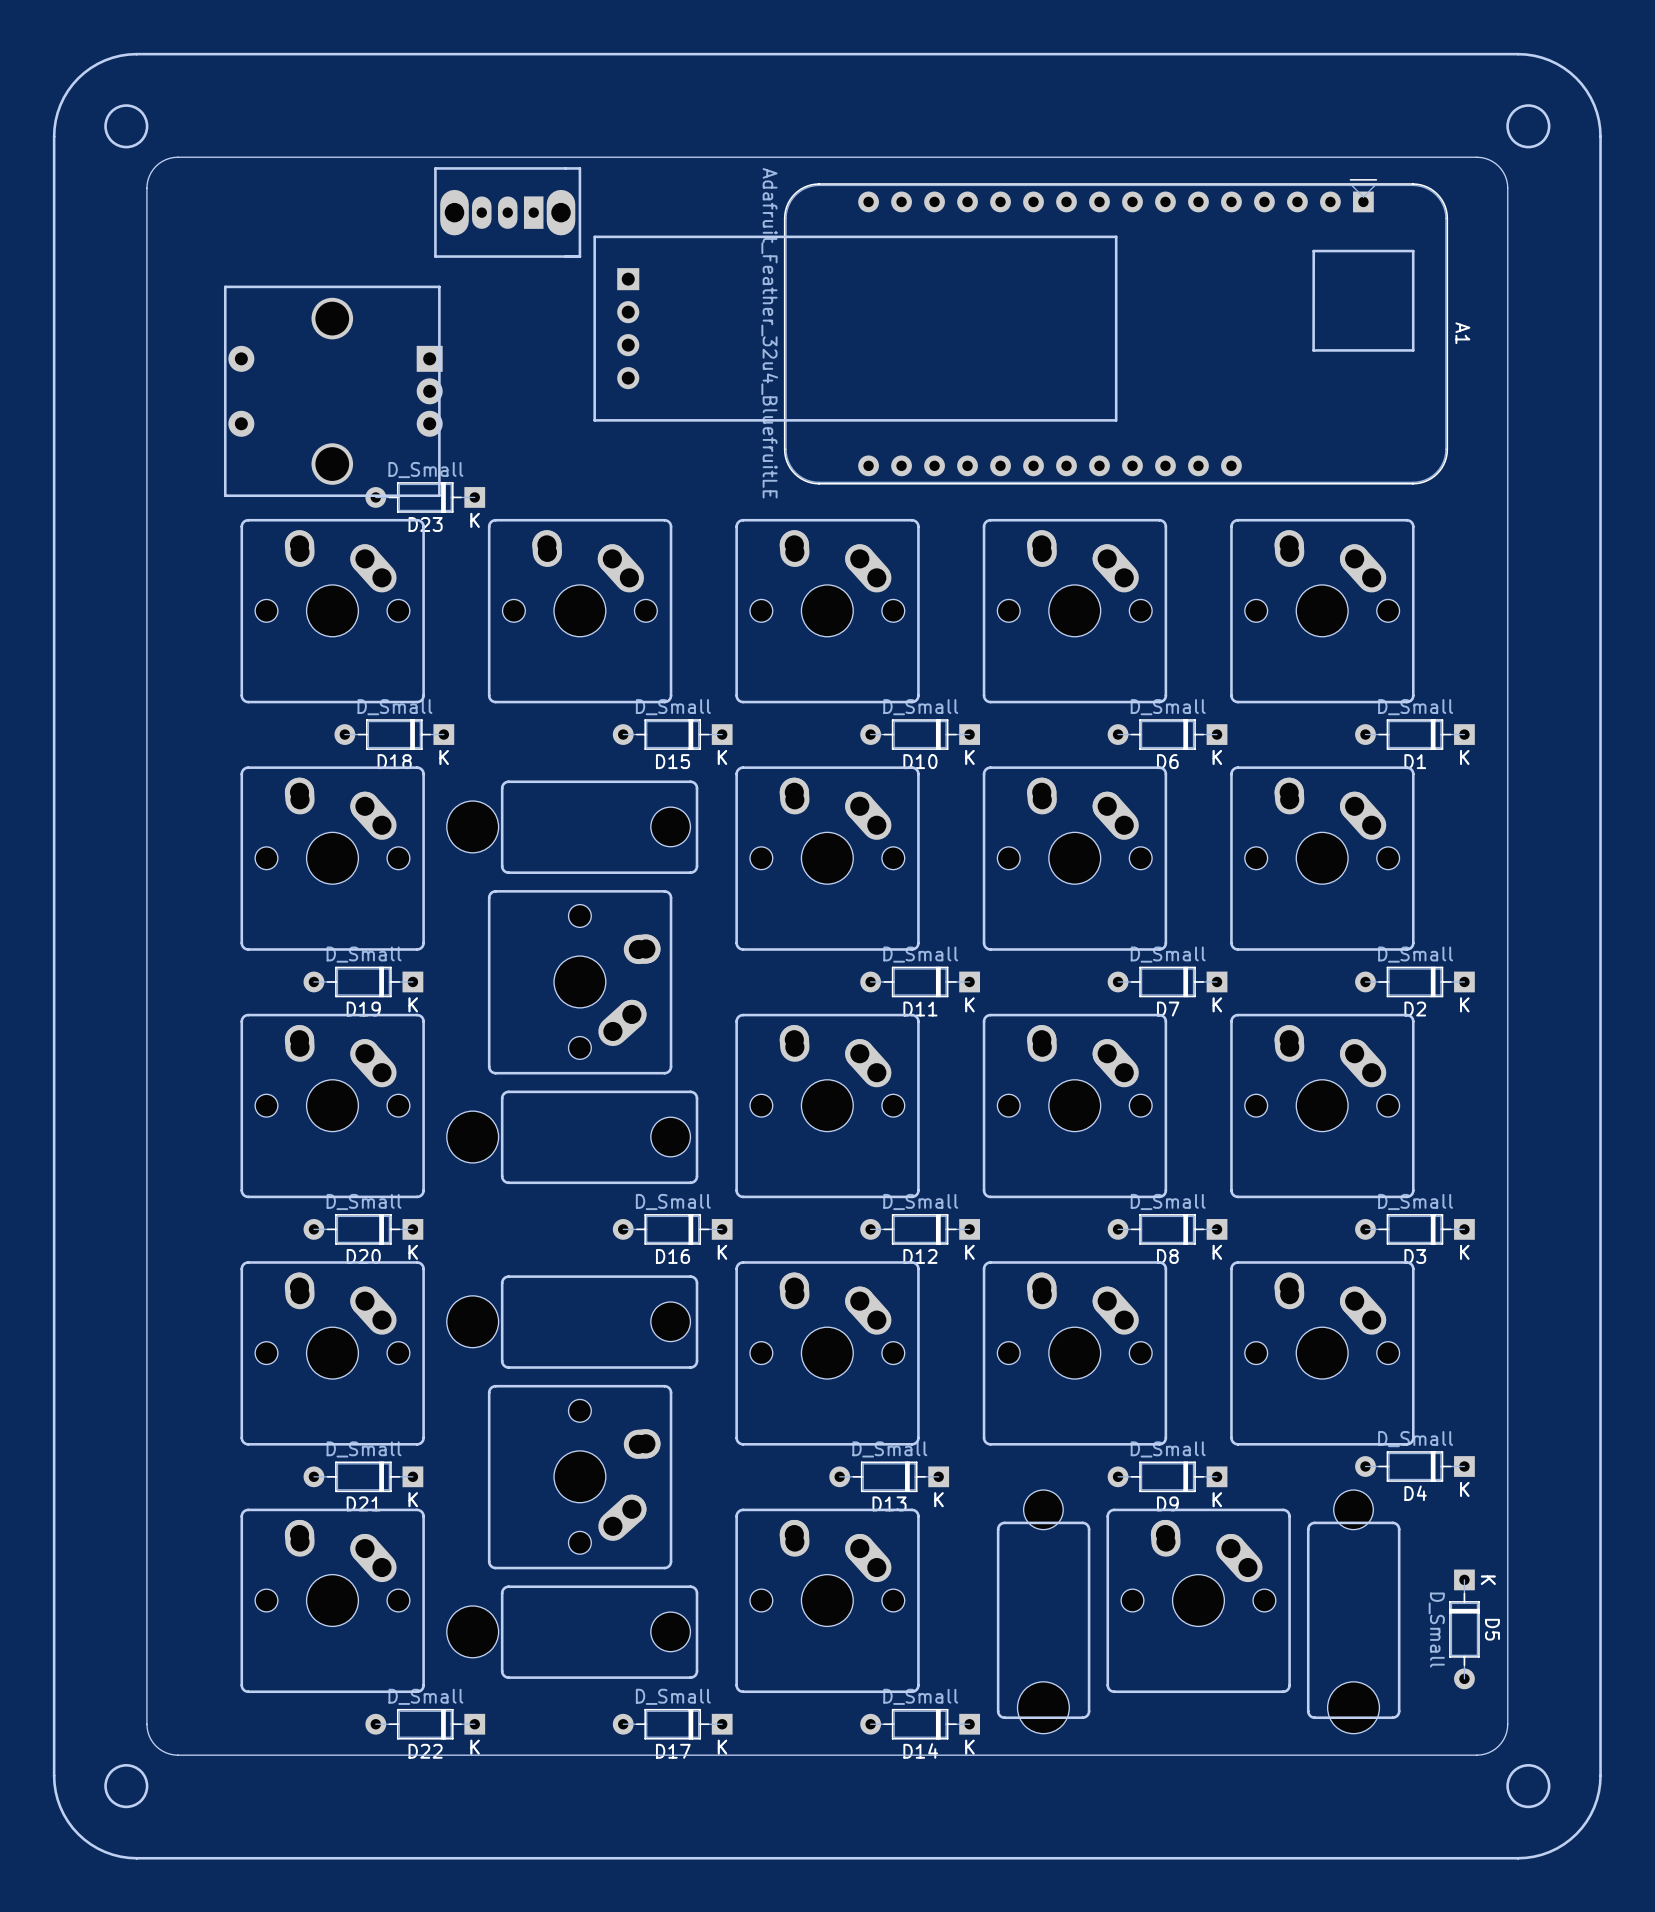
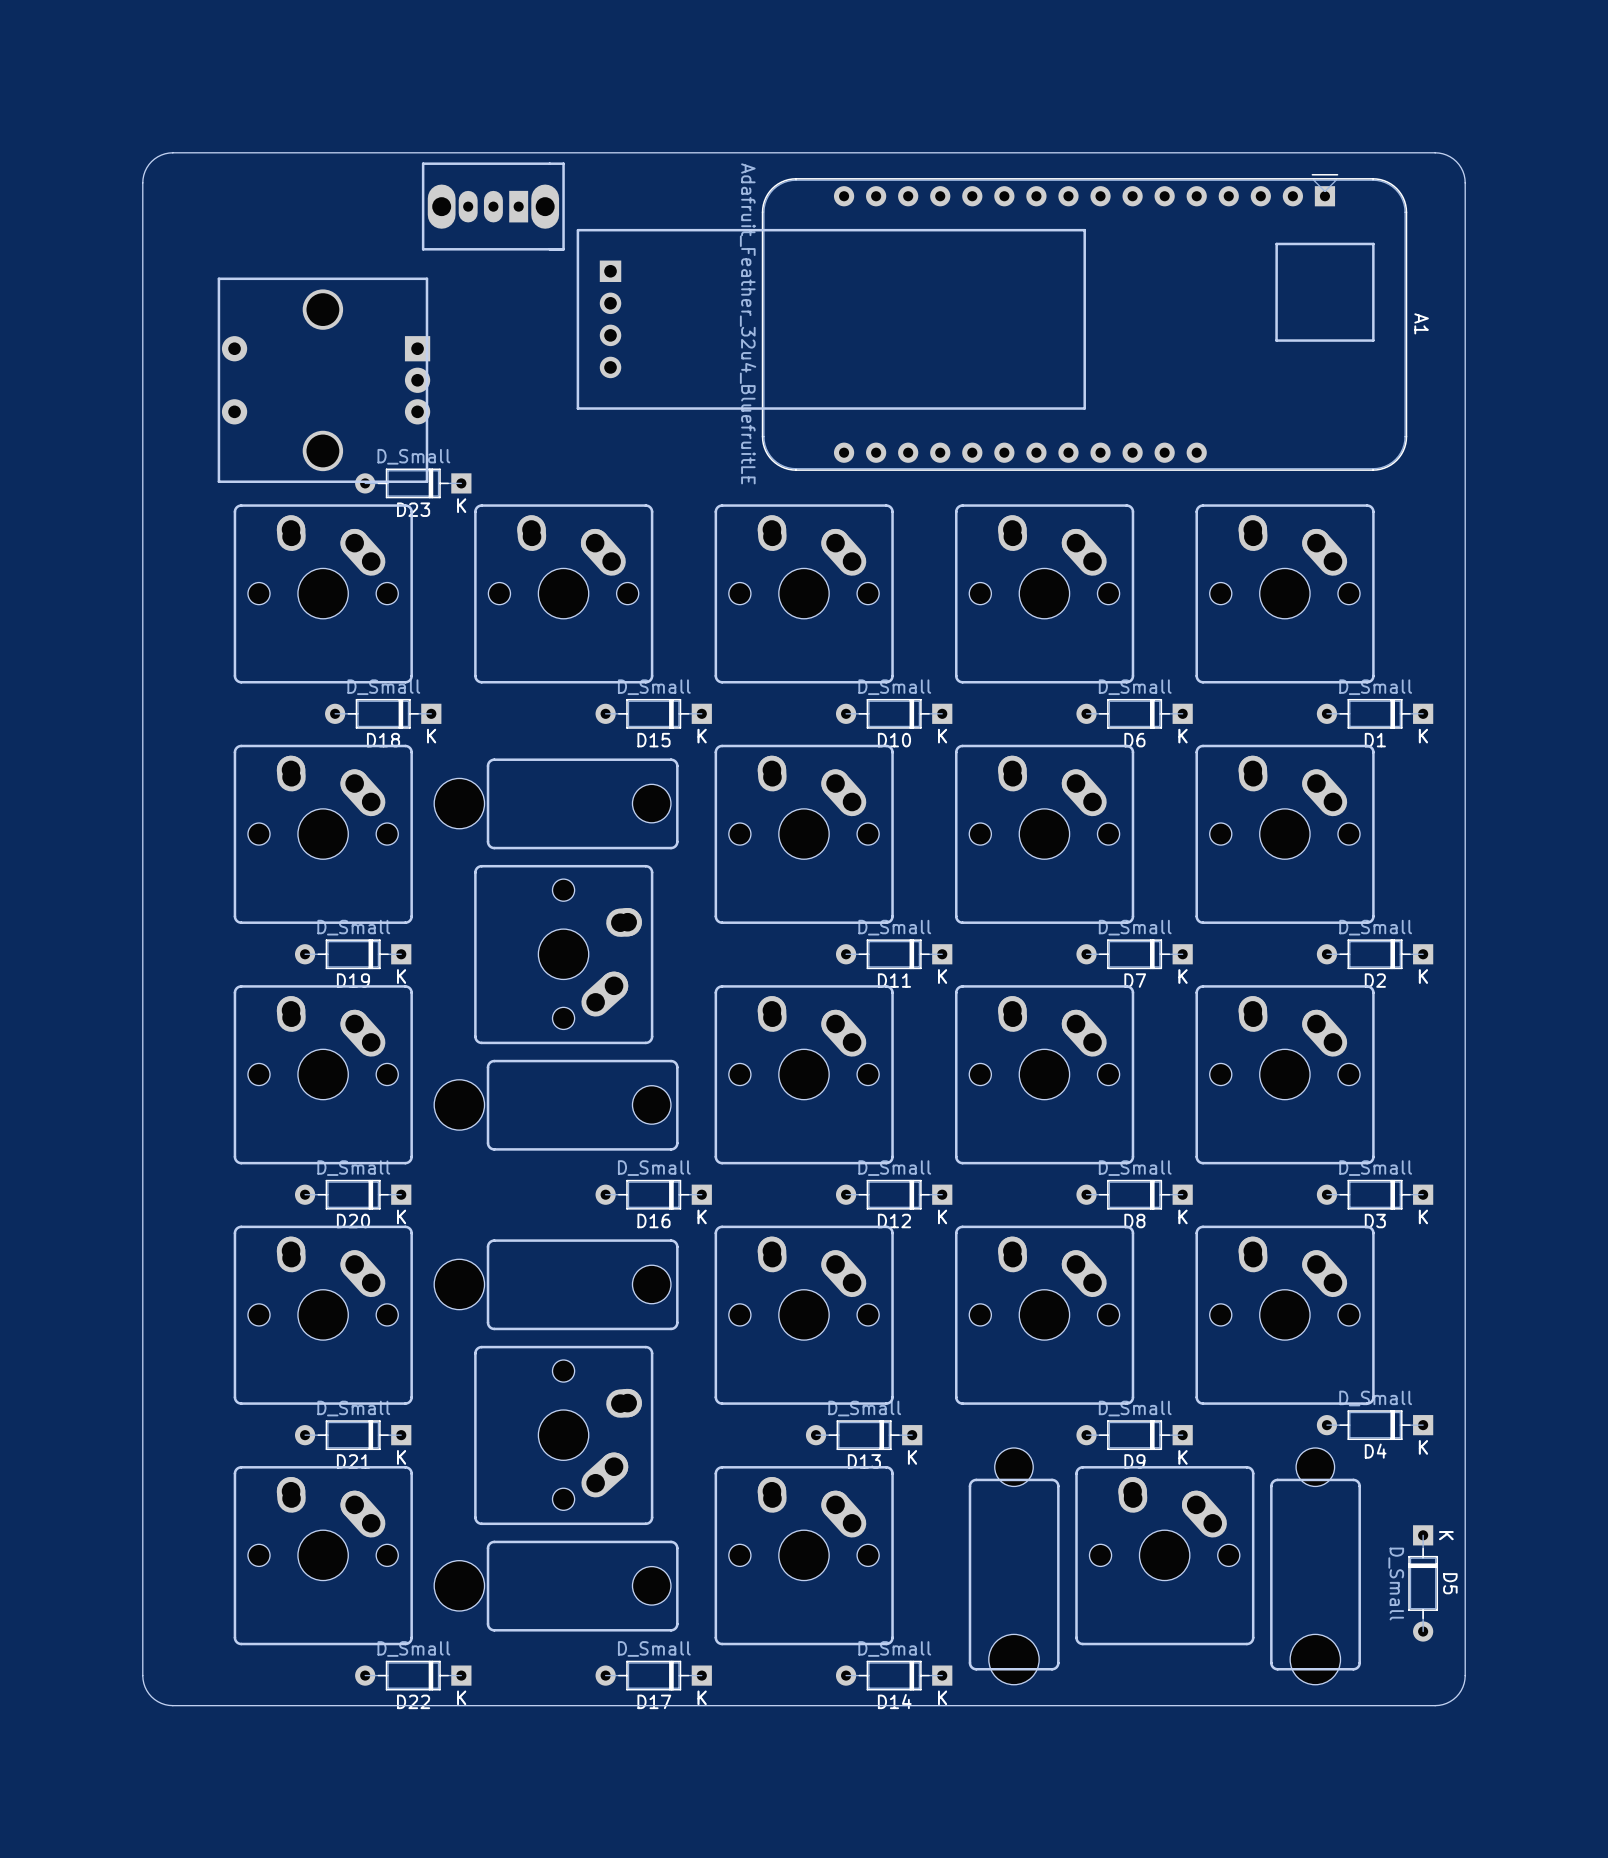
board edge: (1518, 54) (136, 54) (112, 57) (97, 63) (84, 72) (72, 84) (60, 105) (55, 120) (54, 136) (54, 1775) (55, 1791) (60, 1807) (68, 1821) (84, 1839) (97, 1848) (112, 1854) (136, 1858) (1518, 1858) (1534, 1856) (1549, 1851) (1570, 1839) (1581, 1828) (1594, 1807) (1598, 1791) (1600, 1775) (1600, 136) (1598, 120) (1594, 105) (1586, 90) (1576, 78) (1563, 68) (1549, 60) (1534, 55) (1518, 54) -> none
round board edge: [104, 104, 149, 149] -> none
round board edge: [1506, 104, 1551, 149] -> none
round board edge: [104, 1764, 149, 1809] -> none
round board edge: [1506, 1764, 1551, 1809] -> none

